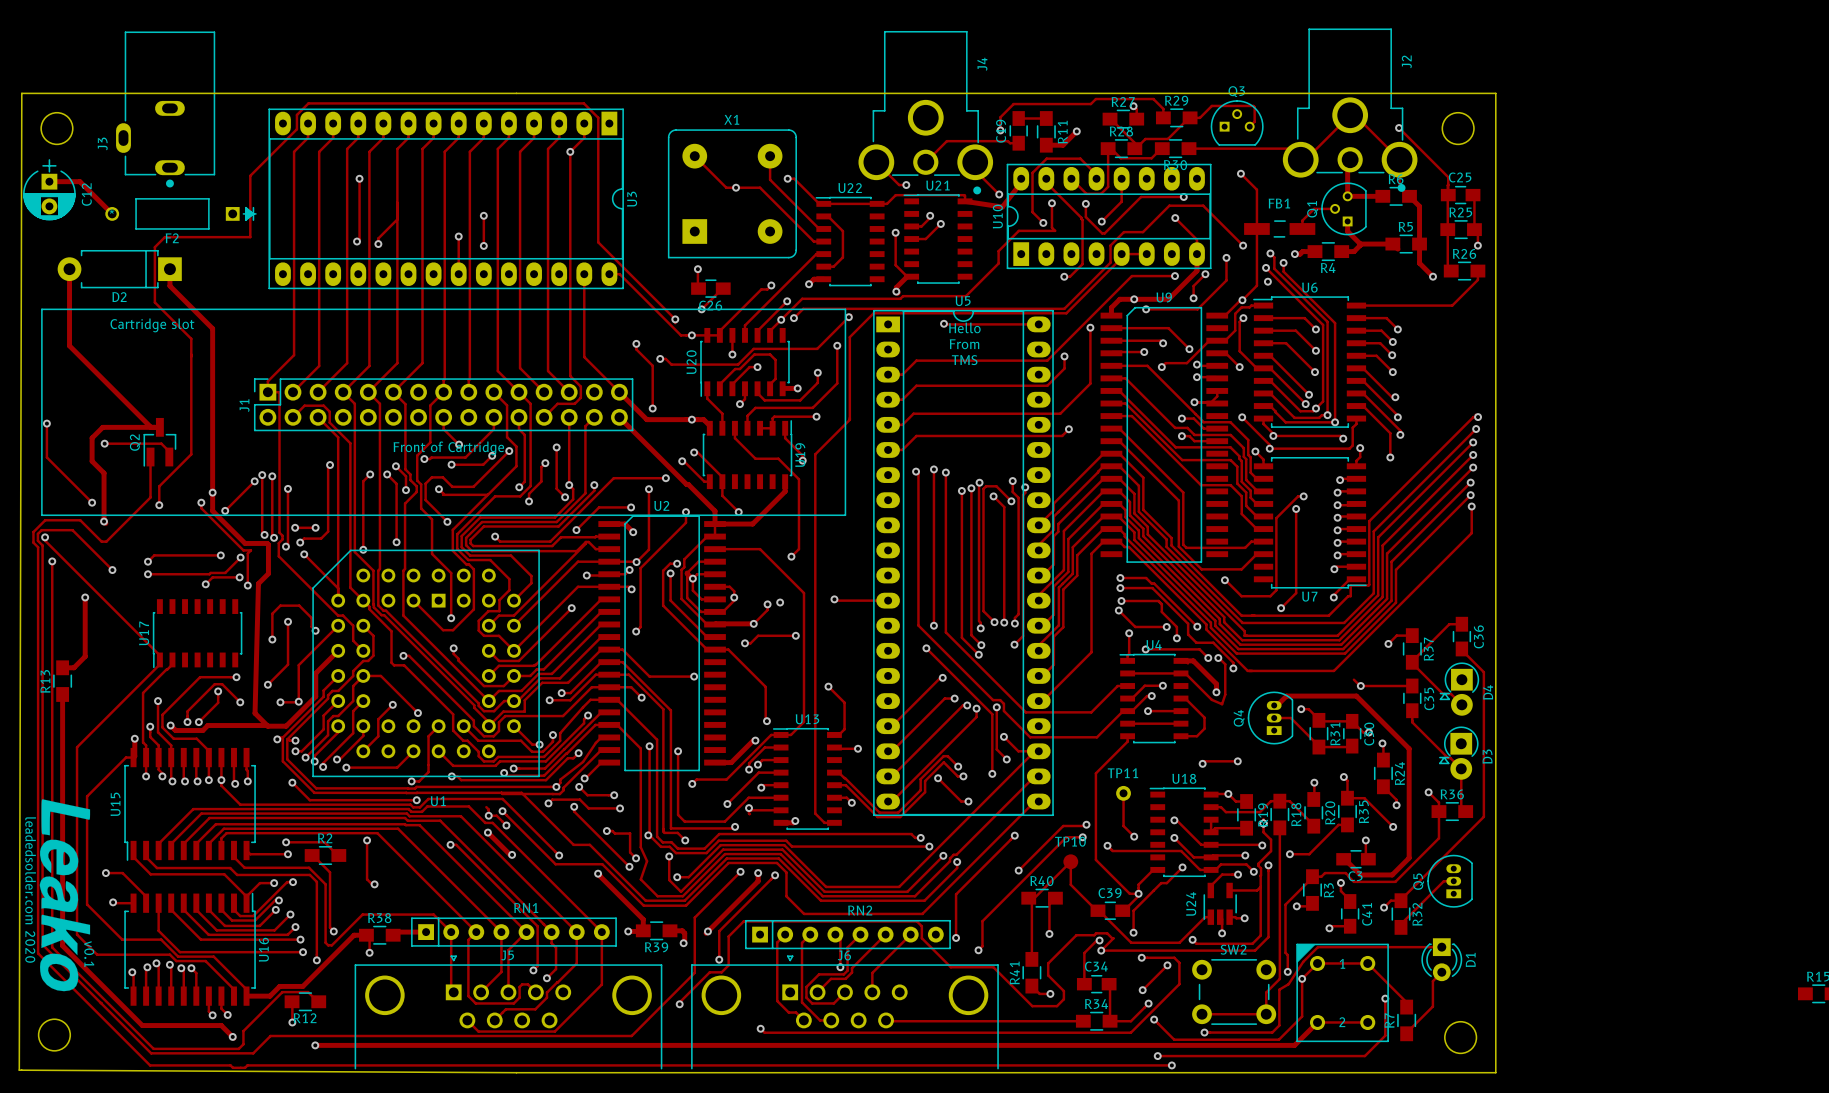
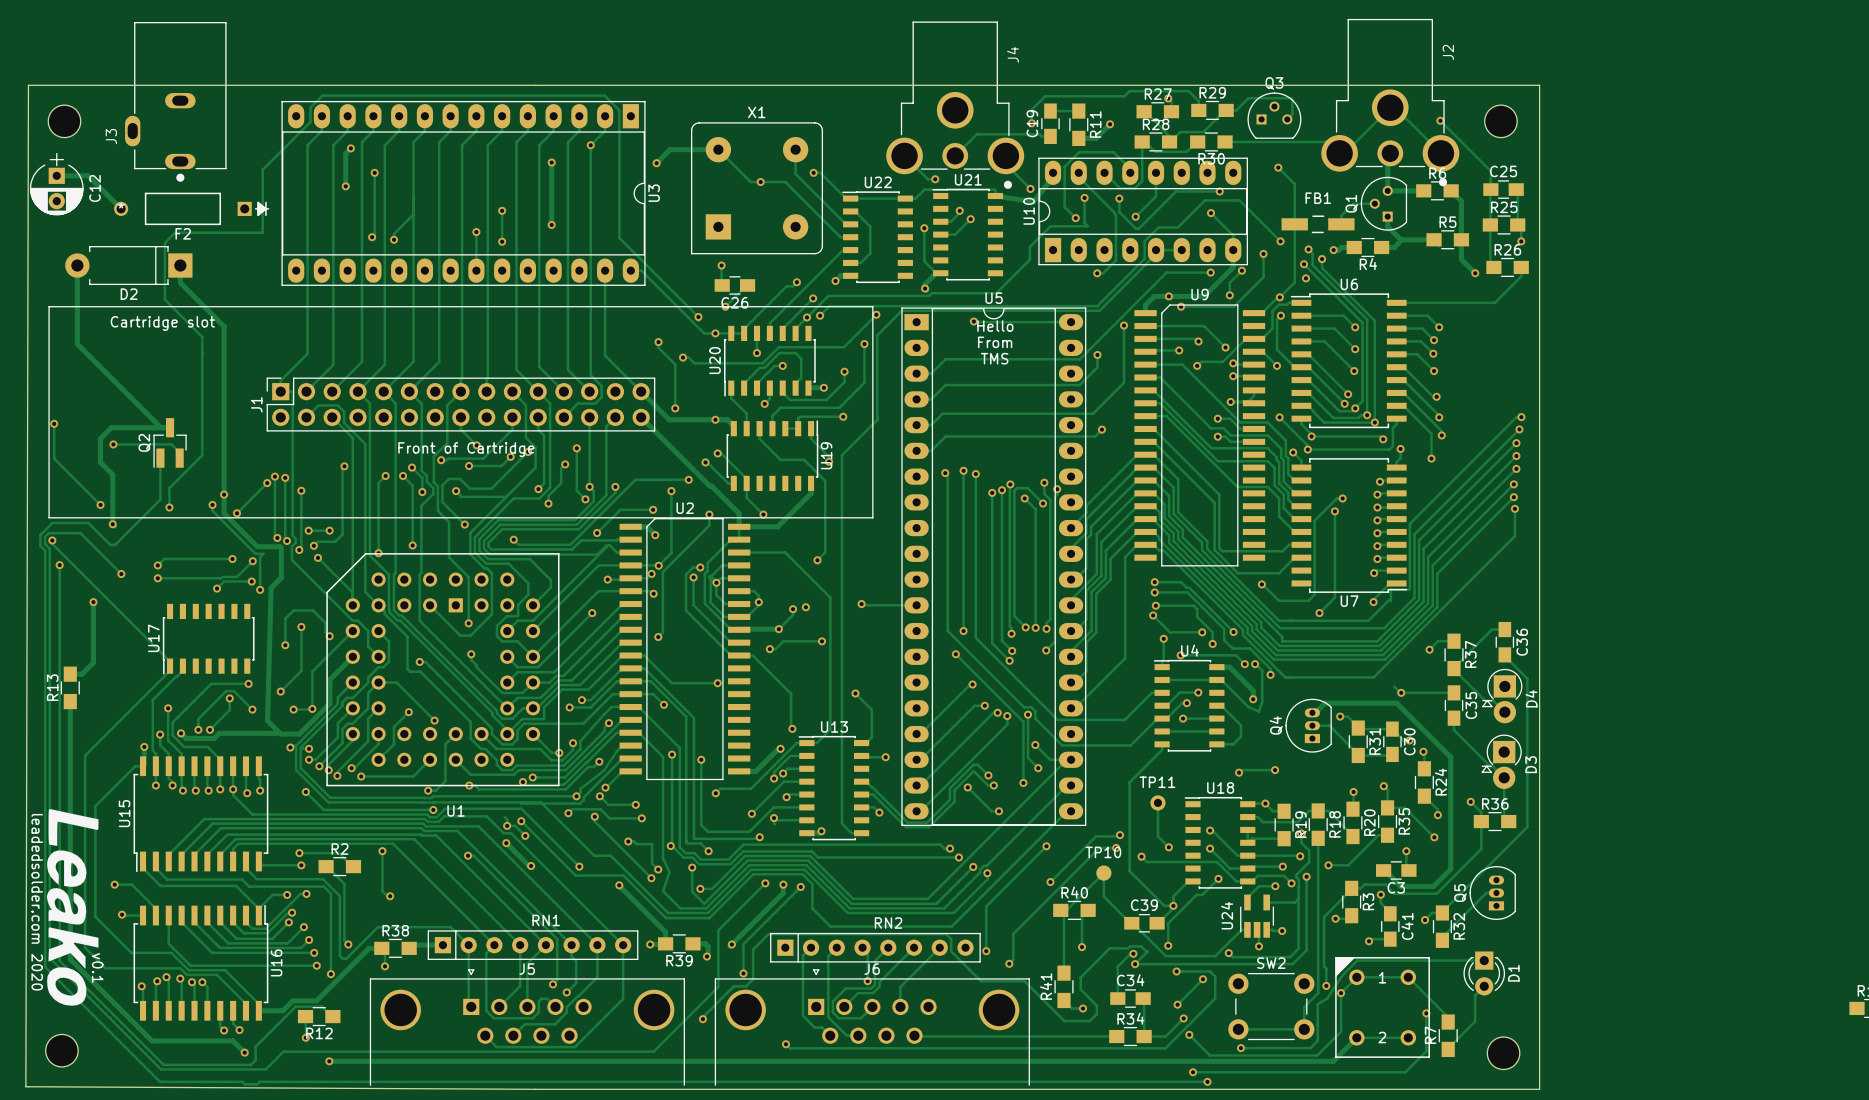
track: none -> (350, 148) (345, 153) (345, 186)
via: none -> (350, 148)
track: none -> (718, 149) (670, 149) (656, 163)
track: none -> (551, 162) (551, 225)
via: none -> (551, 162)
via: none -> (656, 163)
via: none -> (345, 186)
via: none -> (551, 224)

